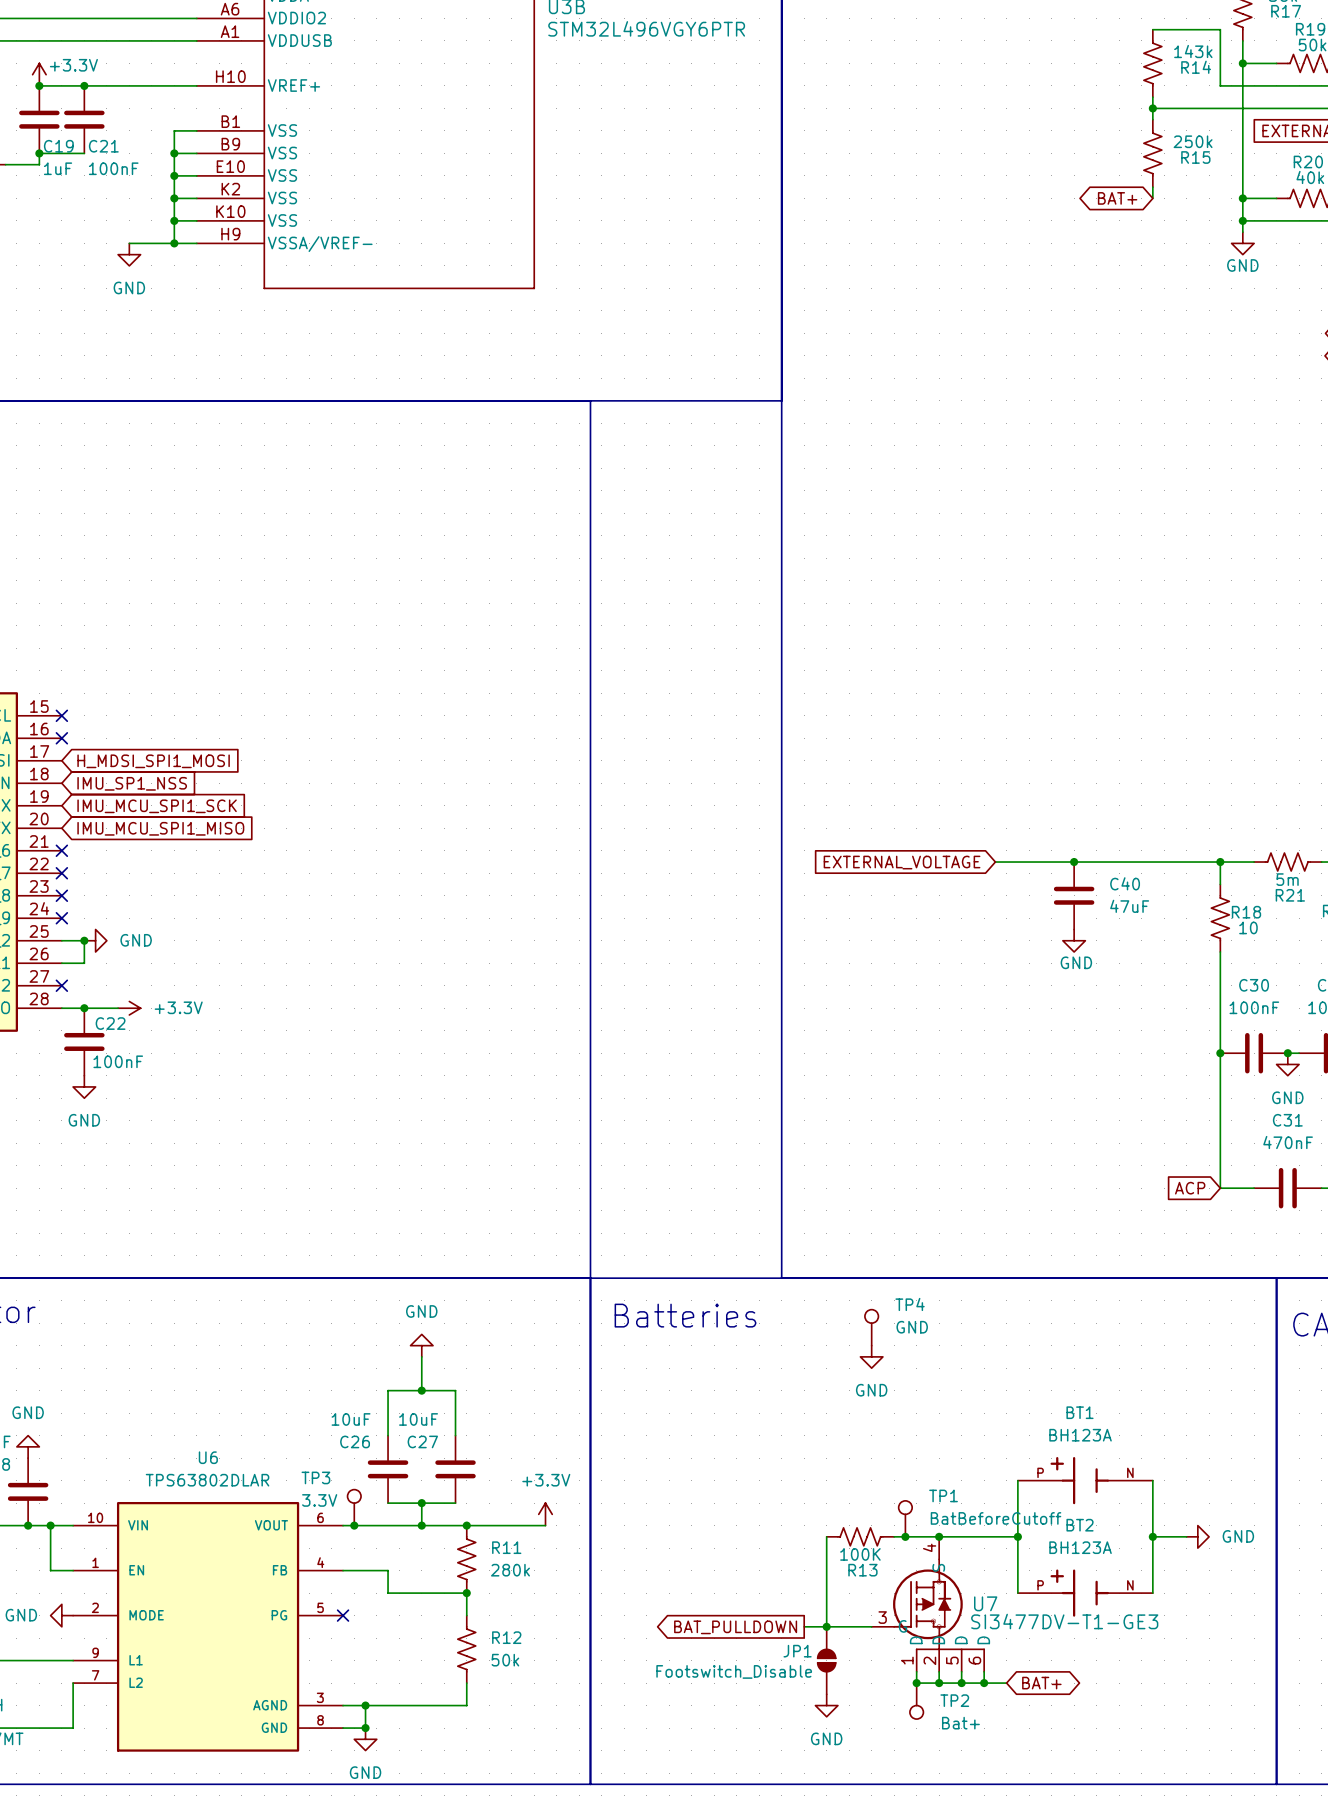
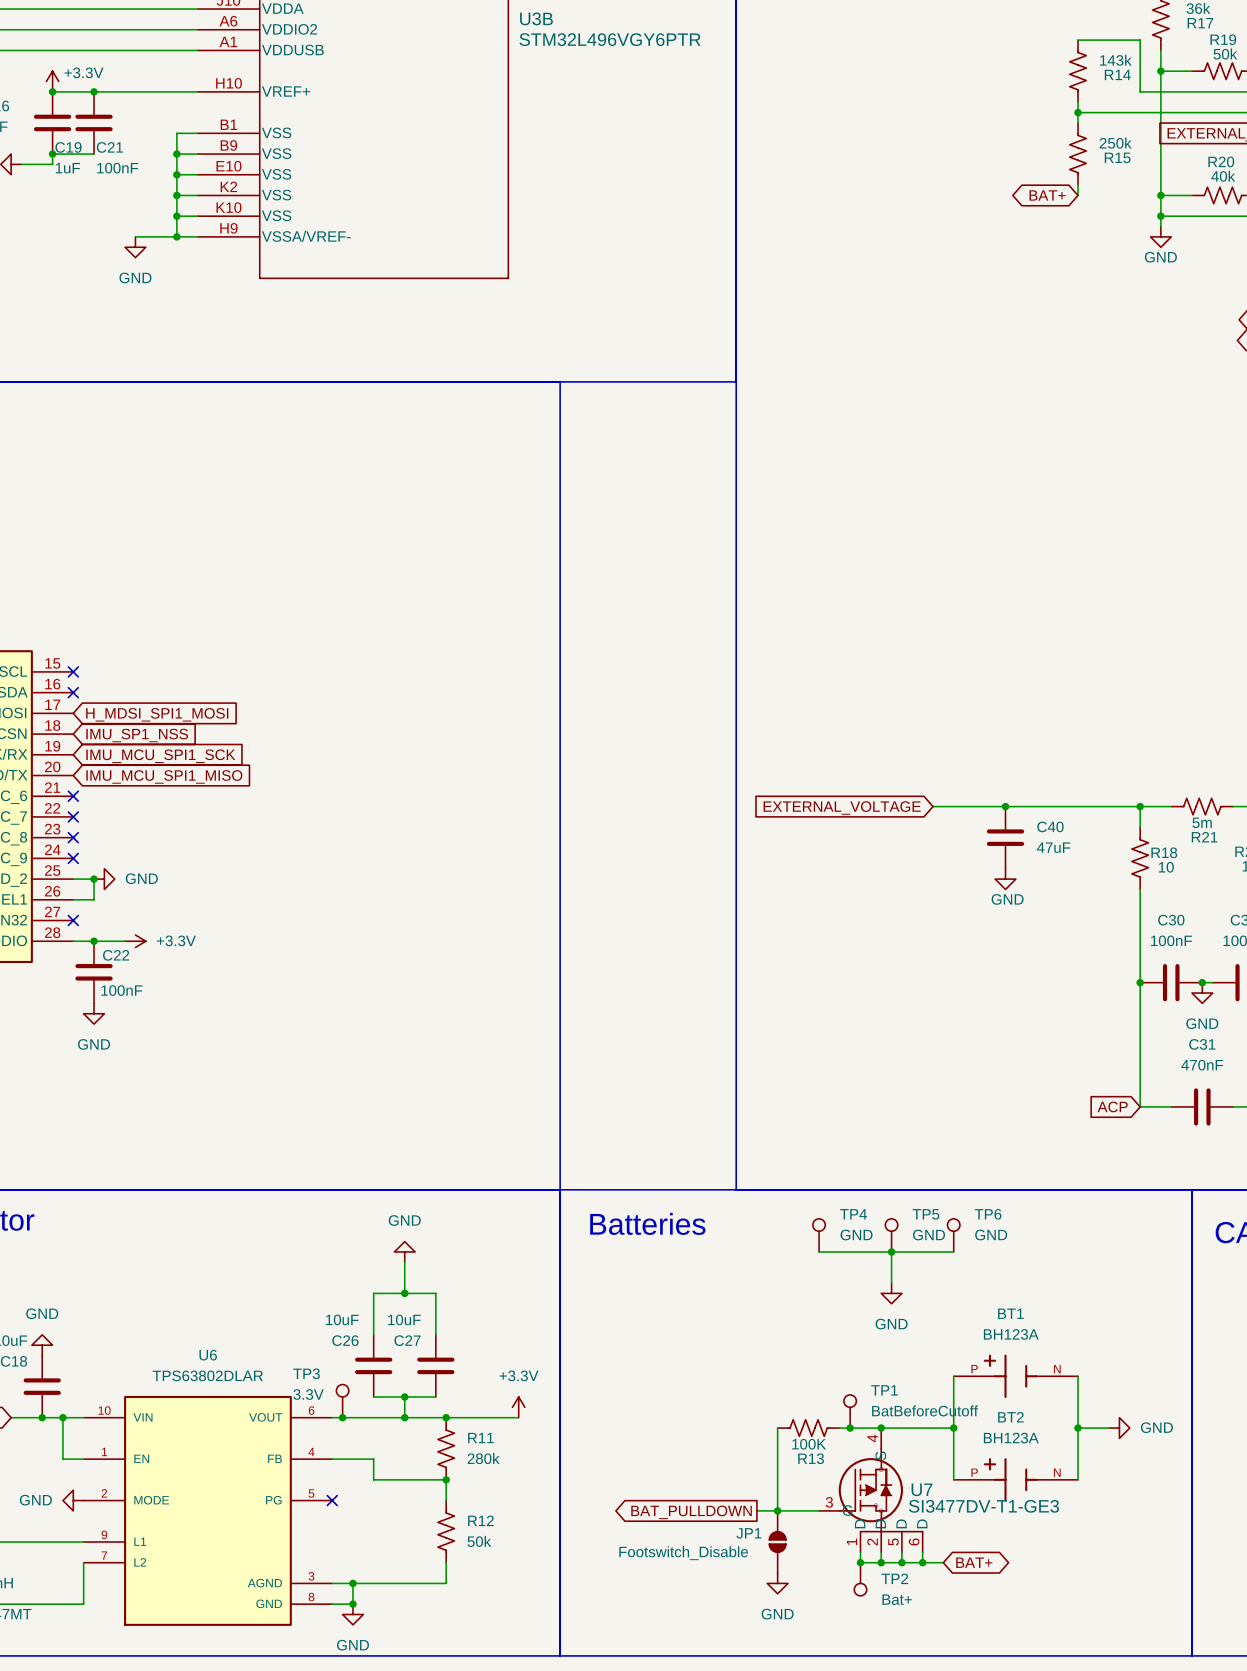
TP5: none -> GND (891, 1235)
TP6: none -> GND (953, 1235)
wire: none -> (819, 1251) (953, 1251)
wire: none -> (891, 1251) (891, 1283)
junction: none -> (891, 1251)
power symbol position: GND (871, 1356) -> GND (891, 1293)

